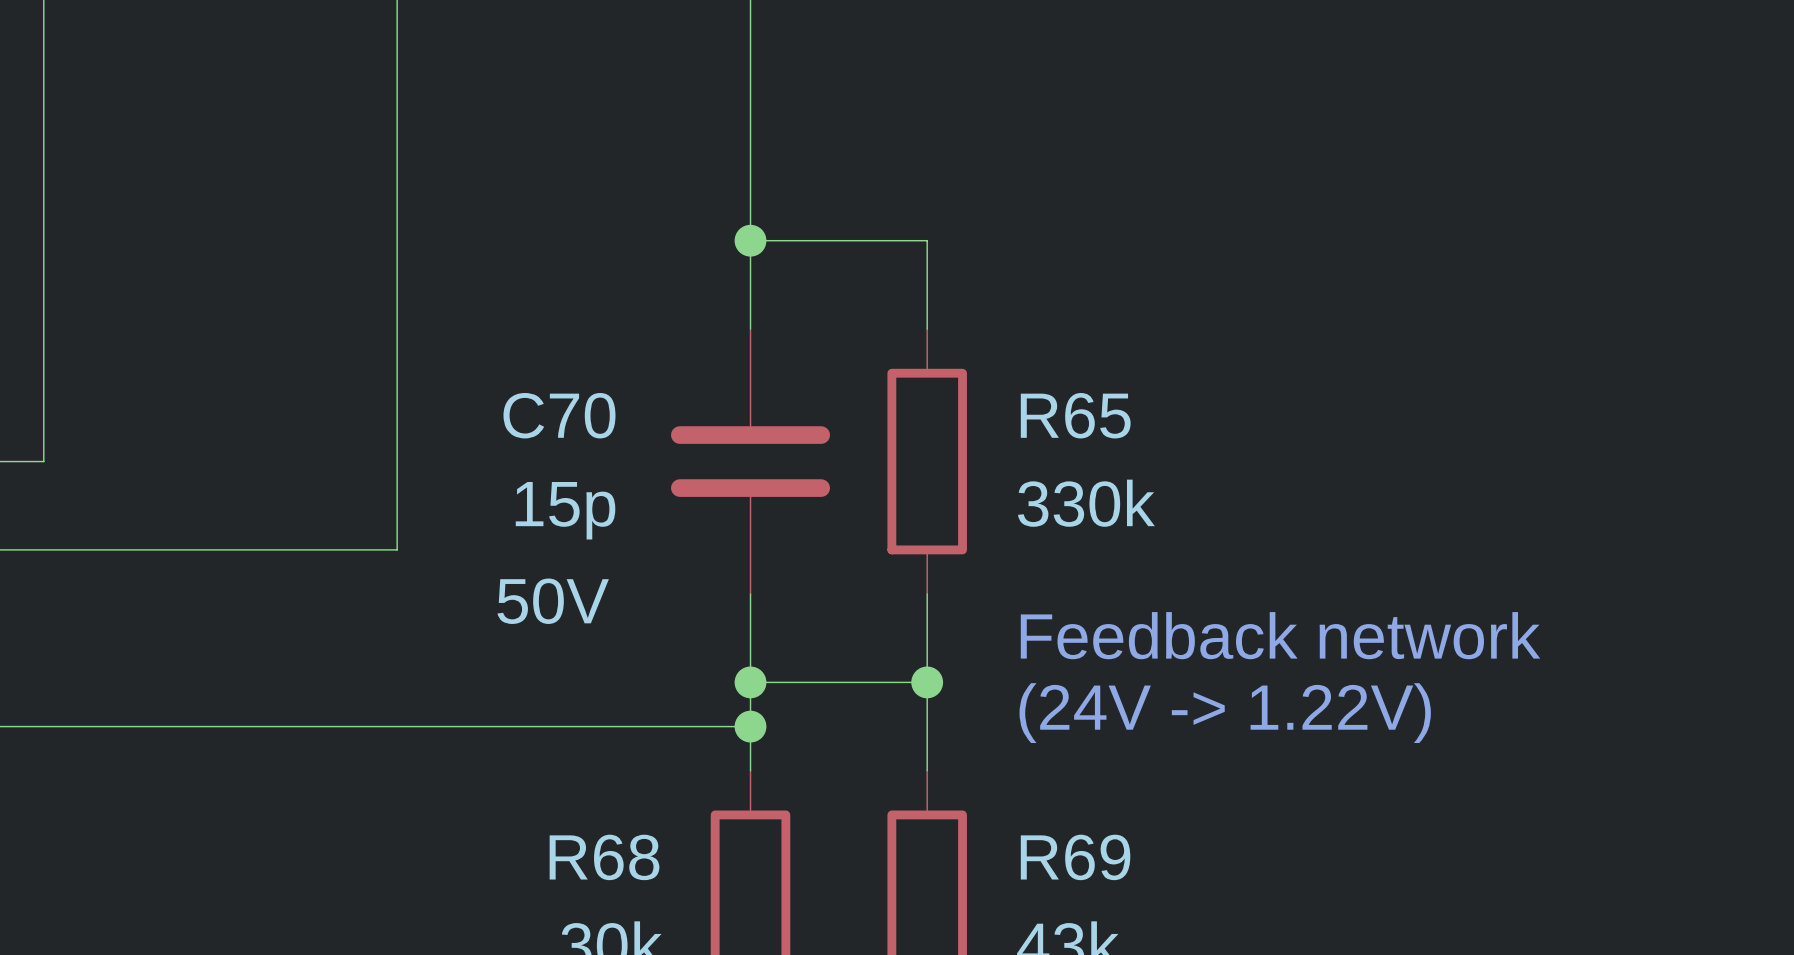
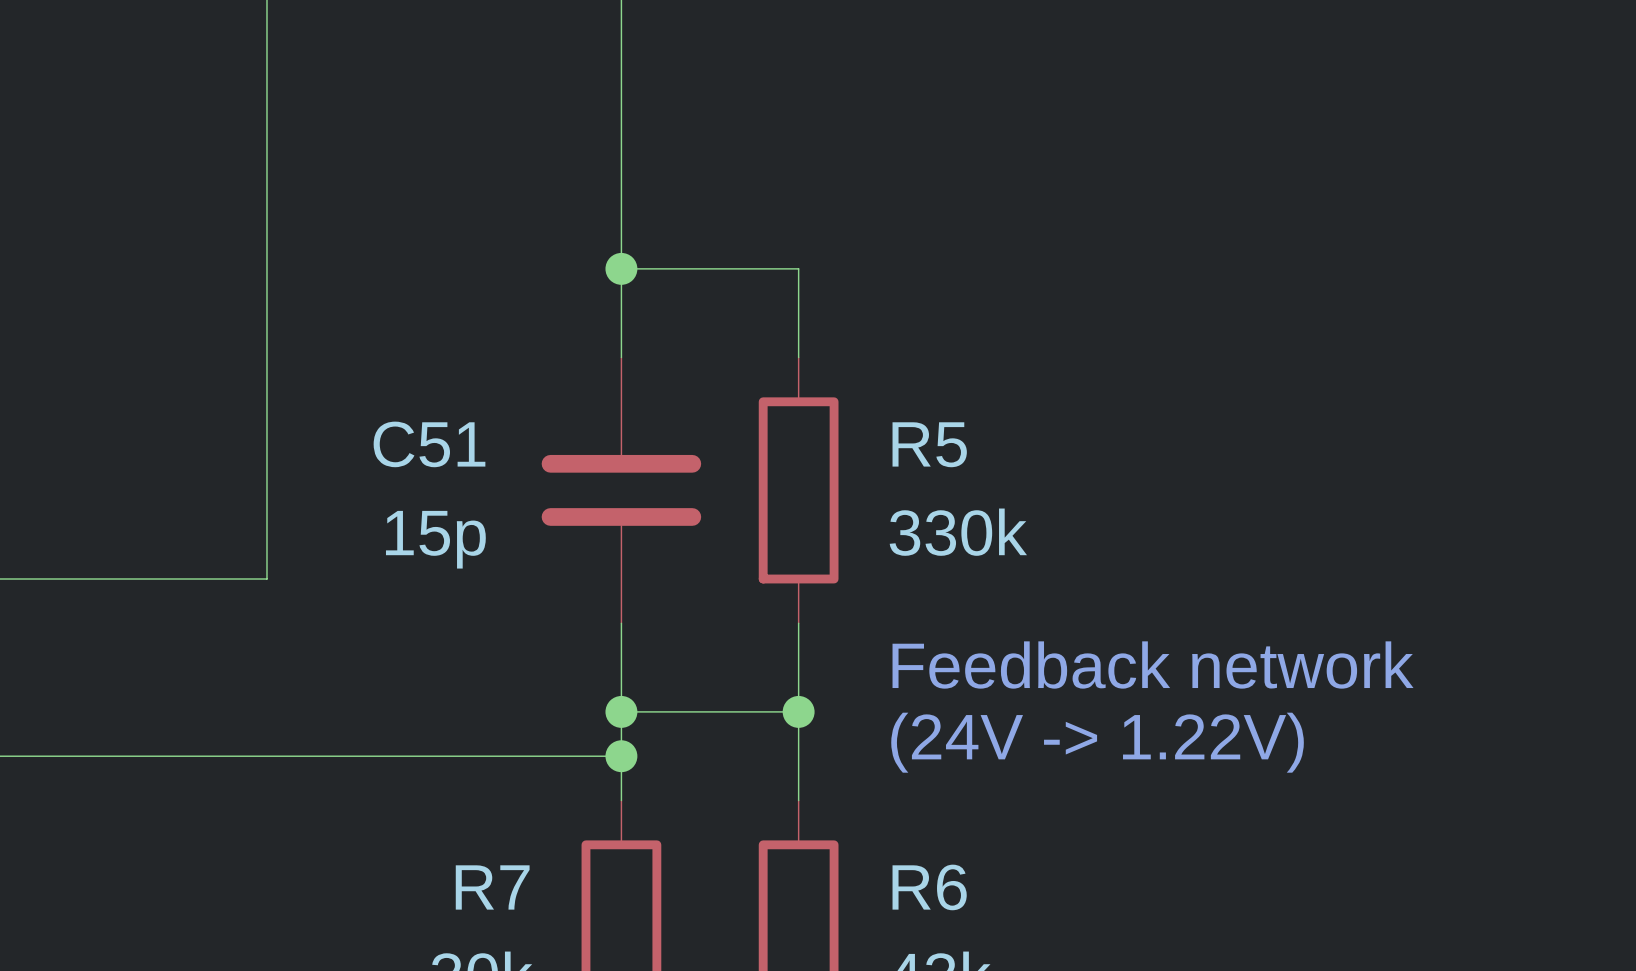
C70 name: C70 (559, 415) -> C51 (429, 444)
R65 name: R65 (1075, 415) -> R5 (929, 444)
C70 text: 50V (553, 601) -> none
R68 name: R68 (604, 857) -> R7 (492, 887)
R69 name: R69 (1075, 857) -> R6 (929, 887)

